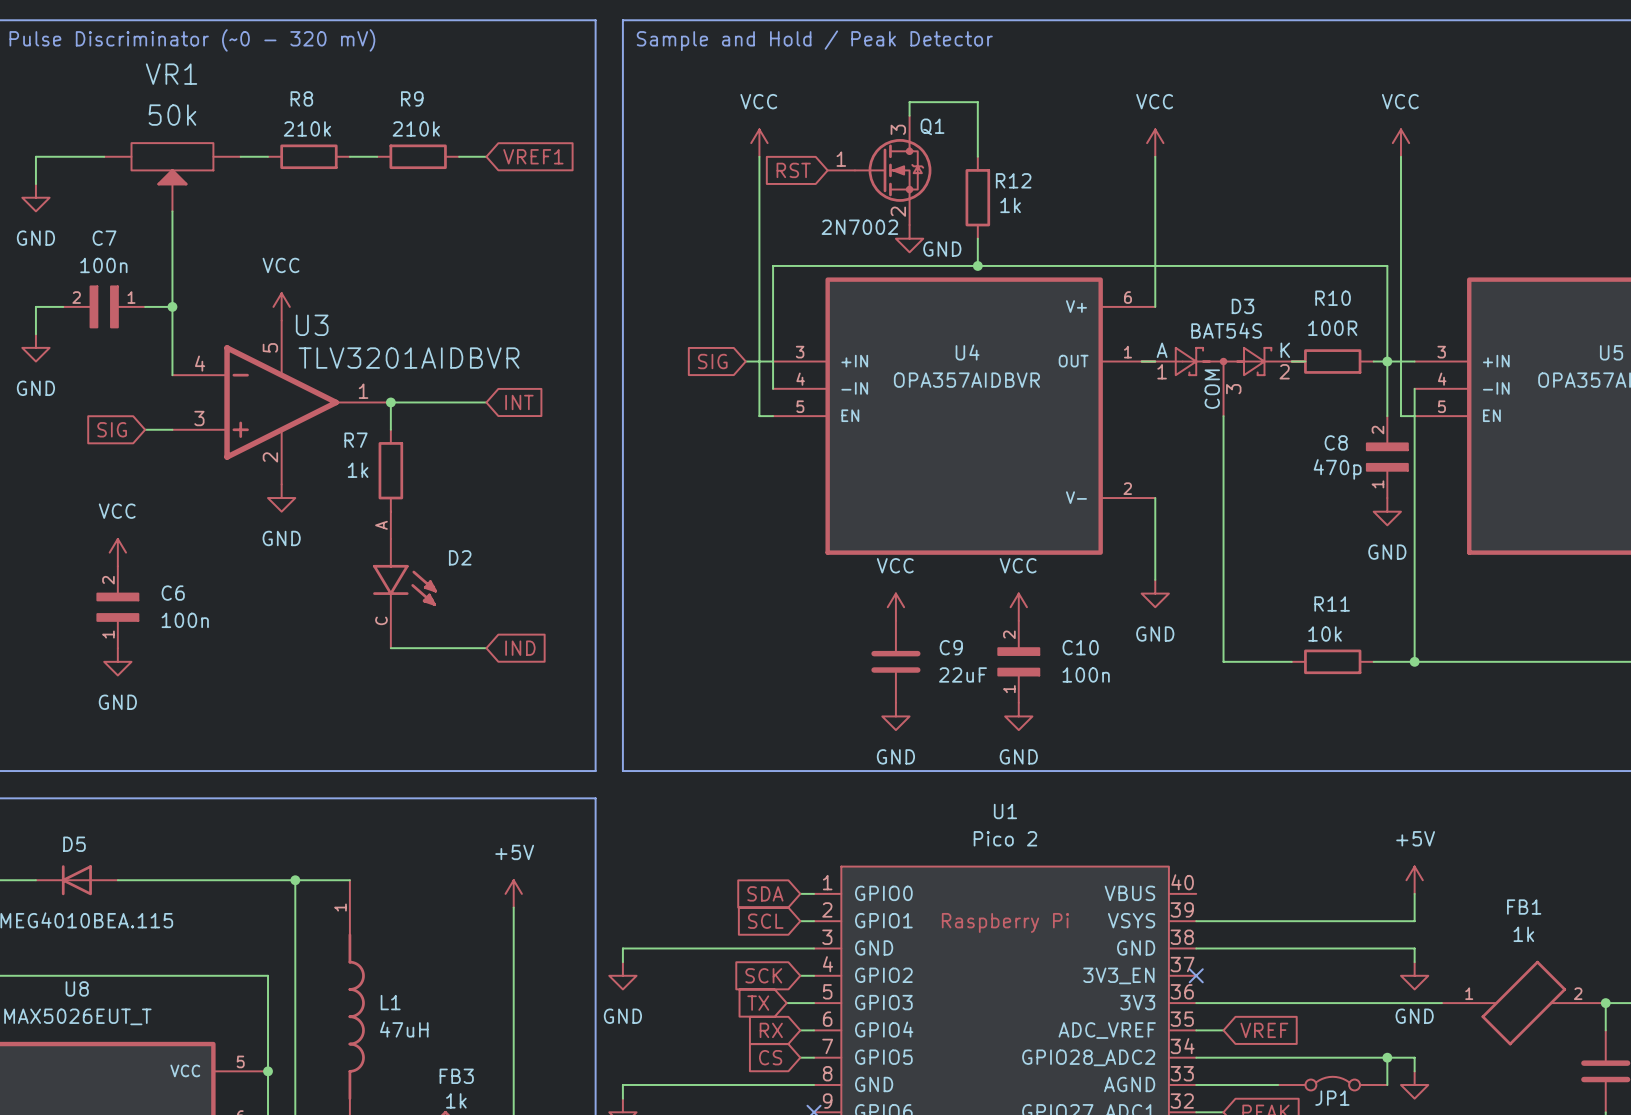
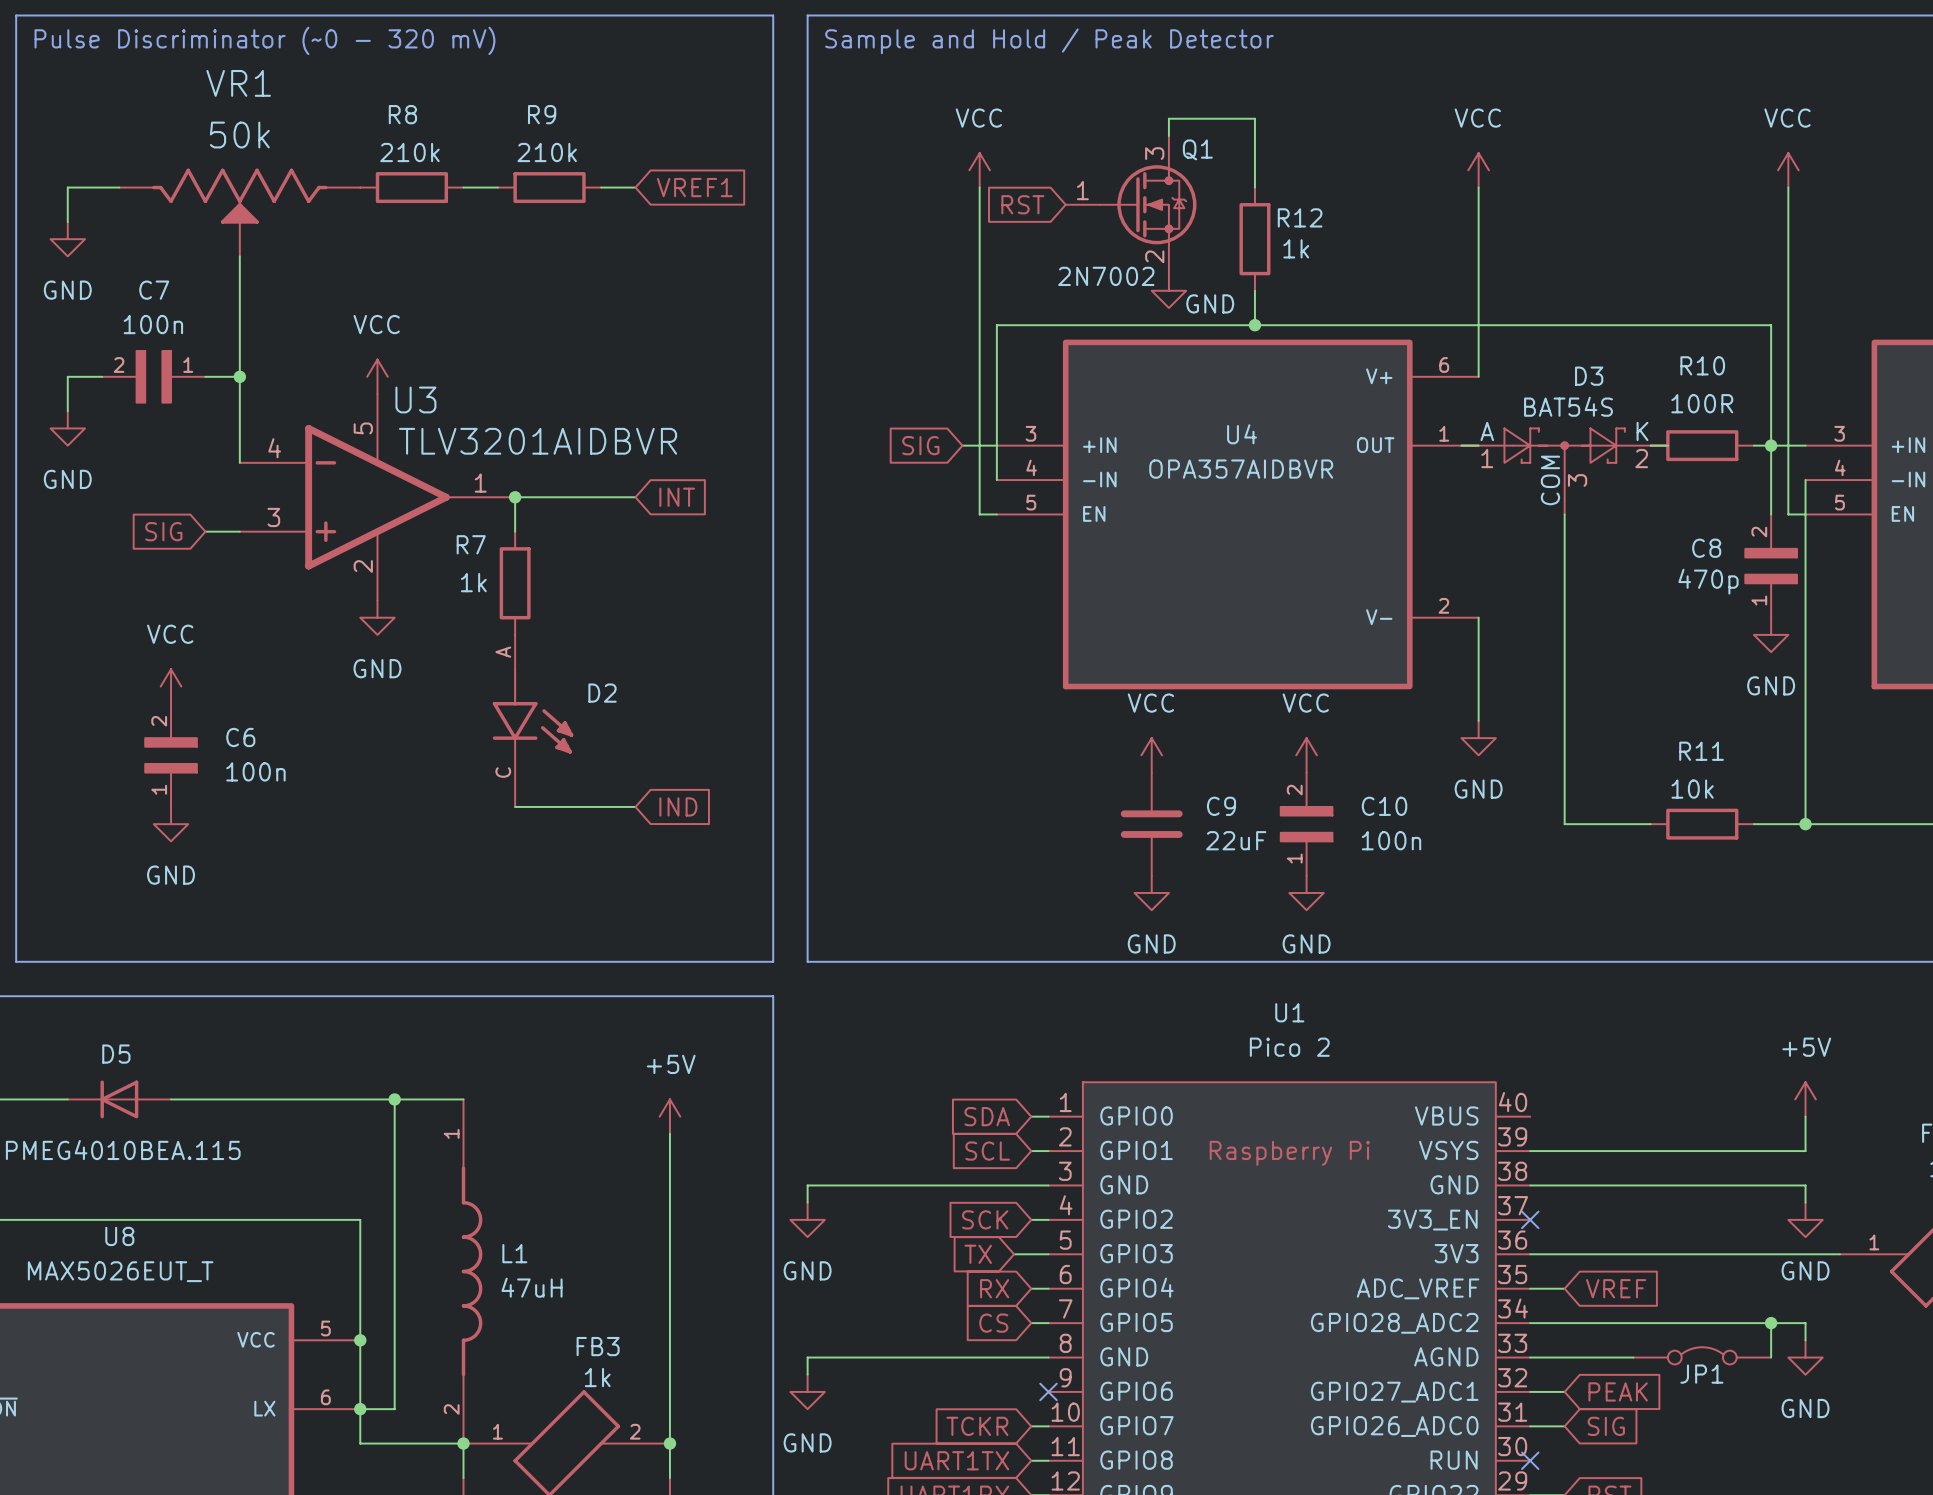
VR1 symbol: [104, 143, 241, 212] -> [119, 168, 361, 257]

